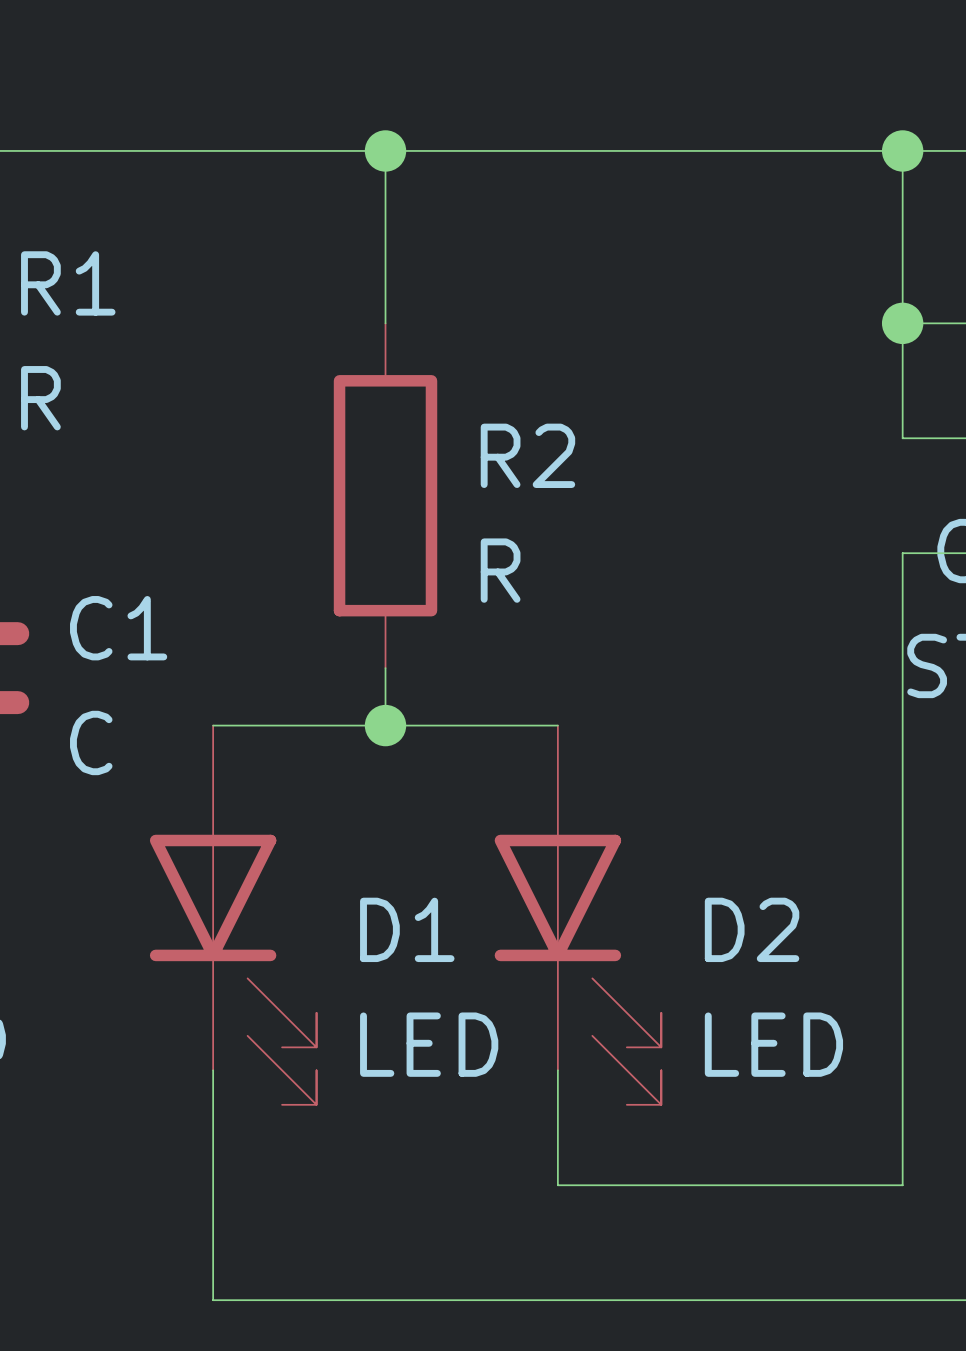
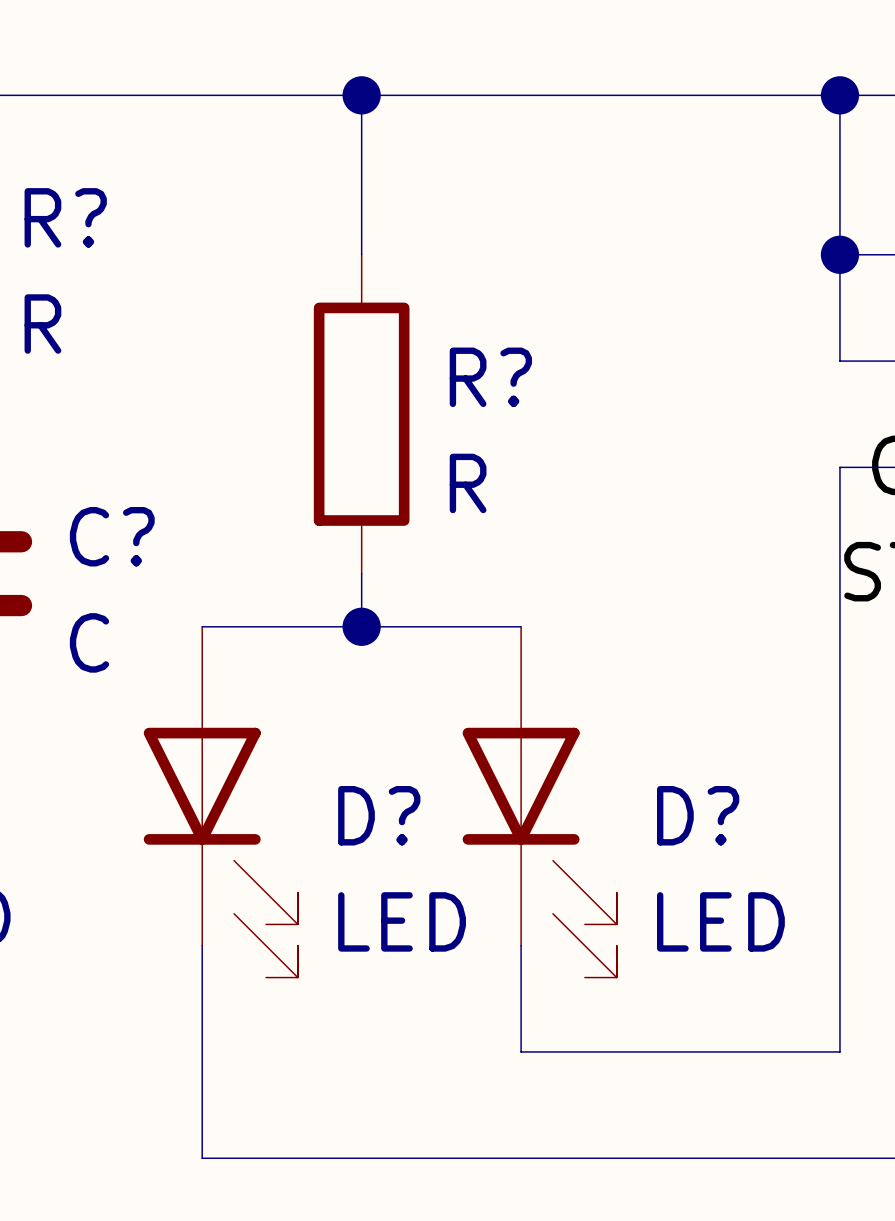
R1 name: R1 (68, 283) -> R? (65, 217)
R2 name: R2 (527, 455) -> R? (490, 377)
C1 name: C1 (118, 628) -> C? (112, 536)
D1 name: D1 (407, 929) -> D? (379, 815)
D2 name: D2 (752, 929) -> D? (698, 815)

